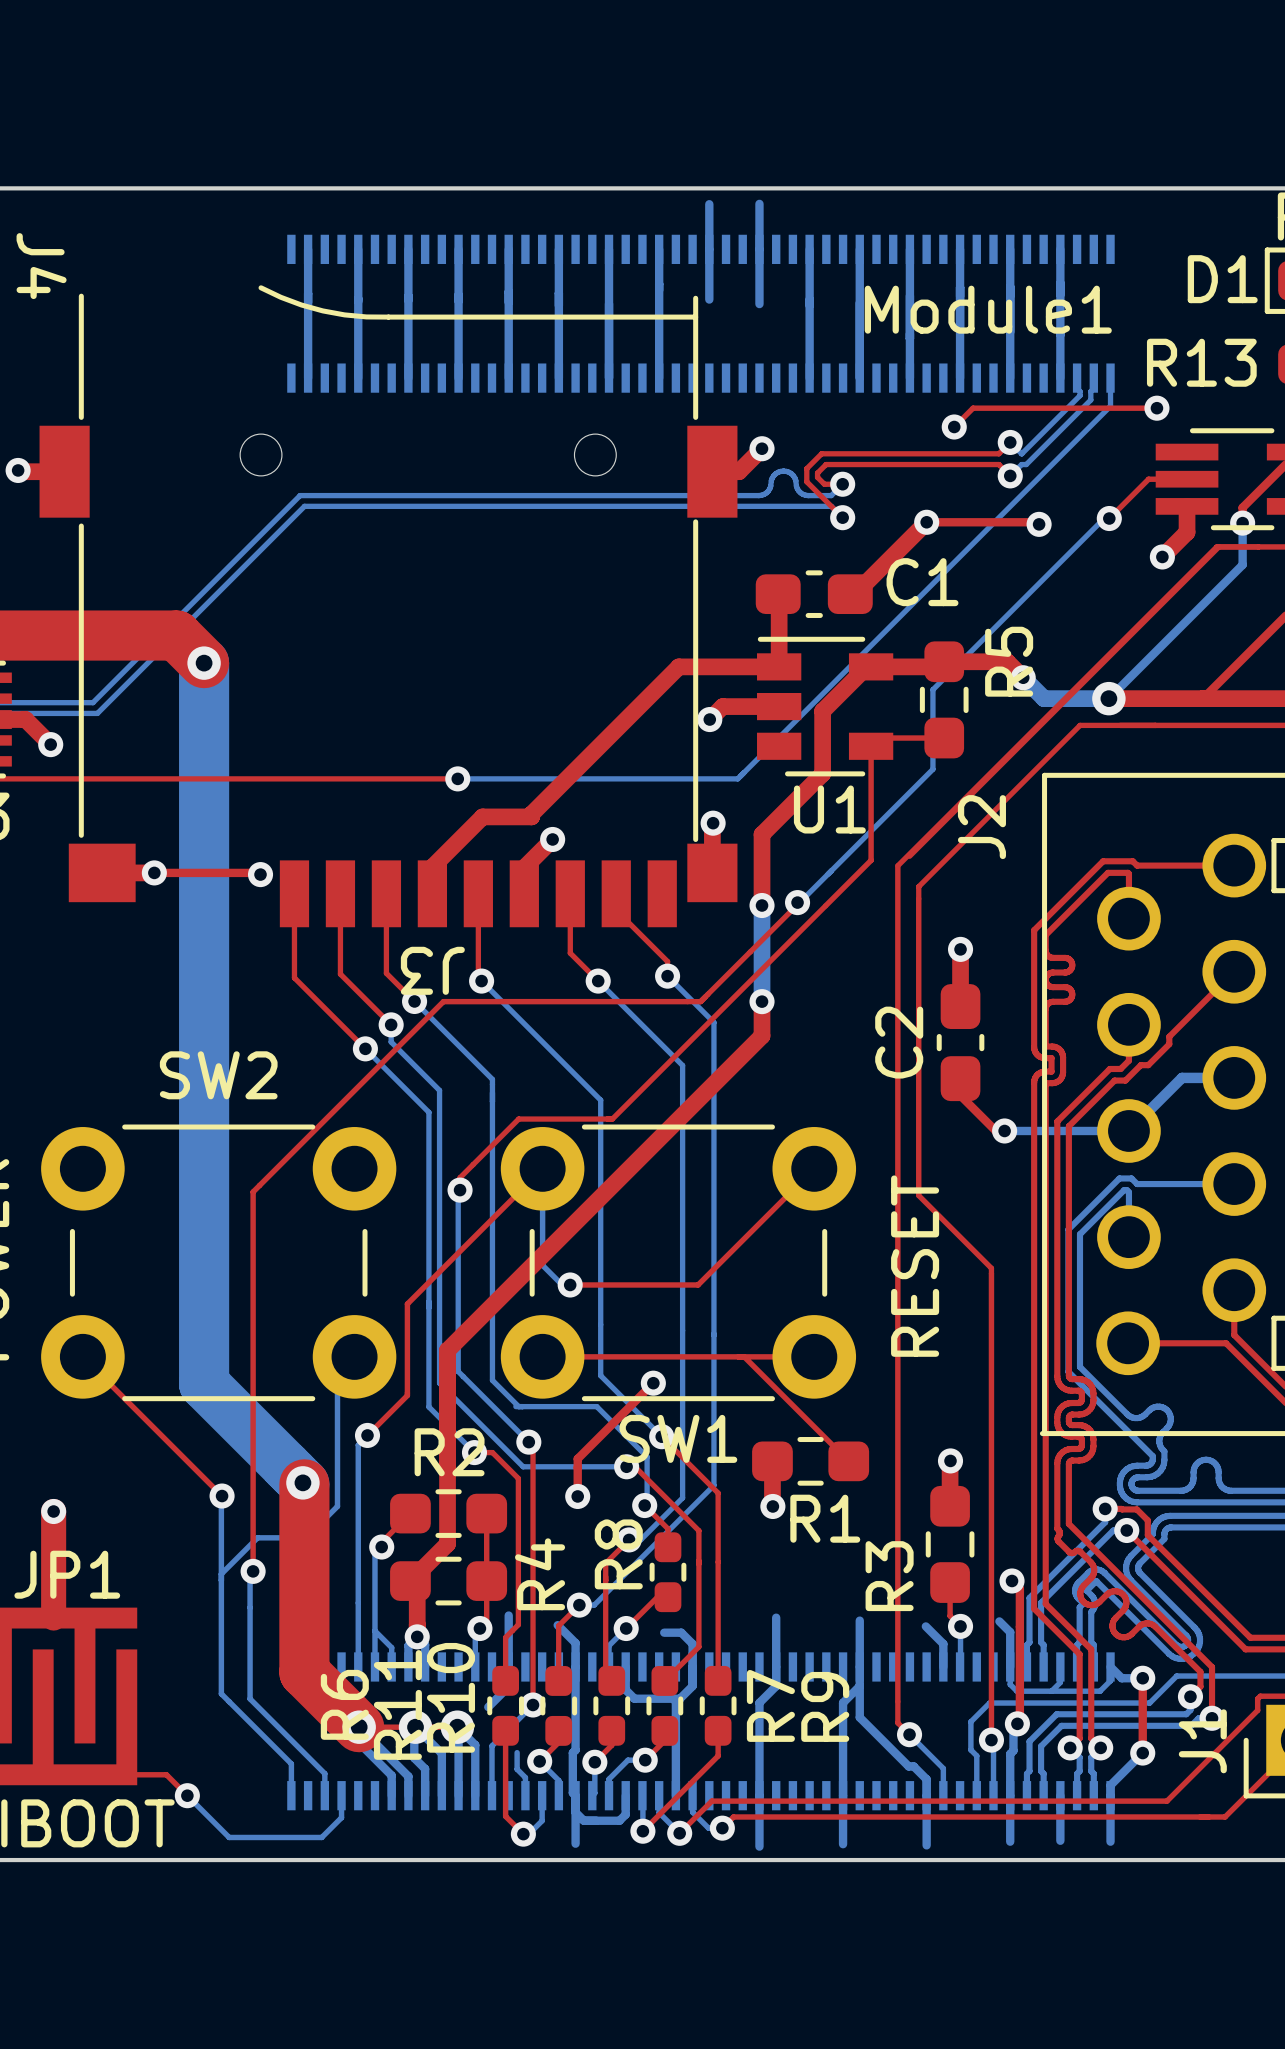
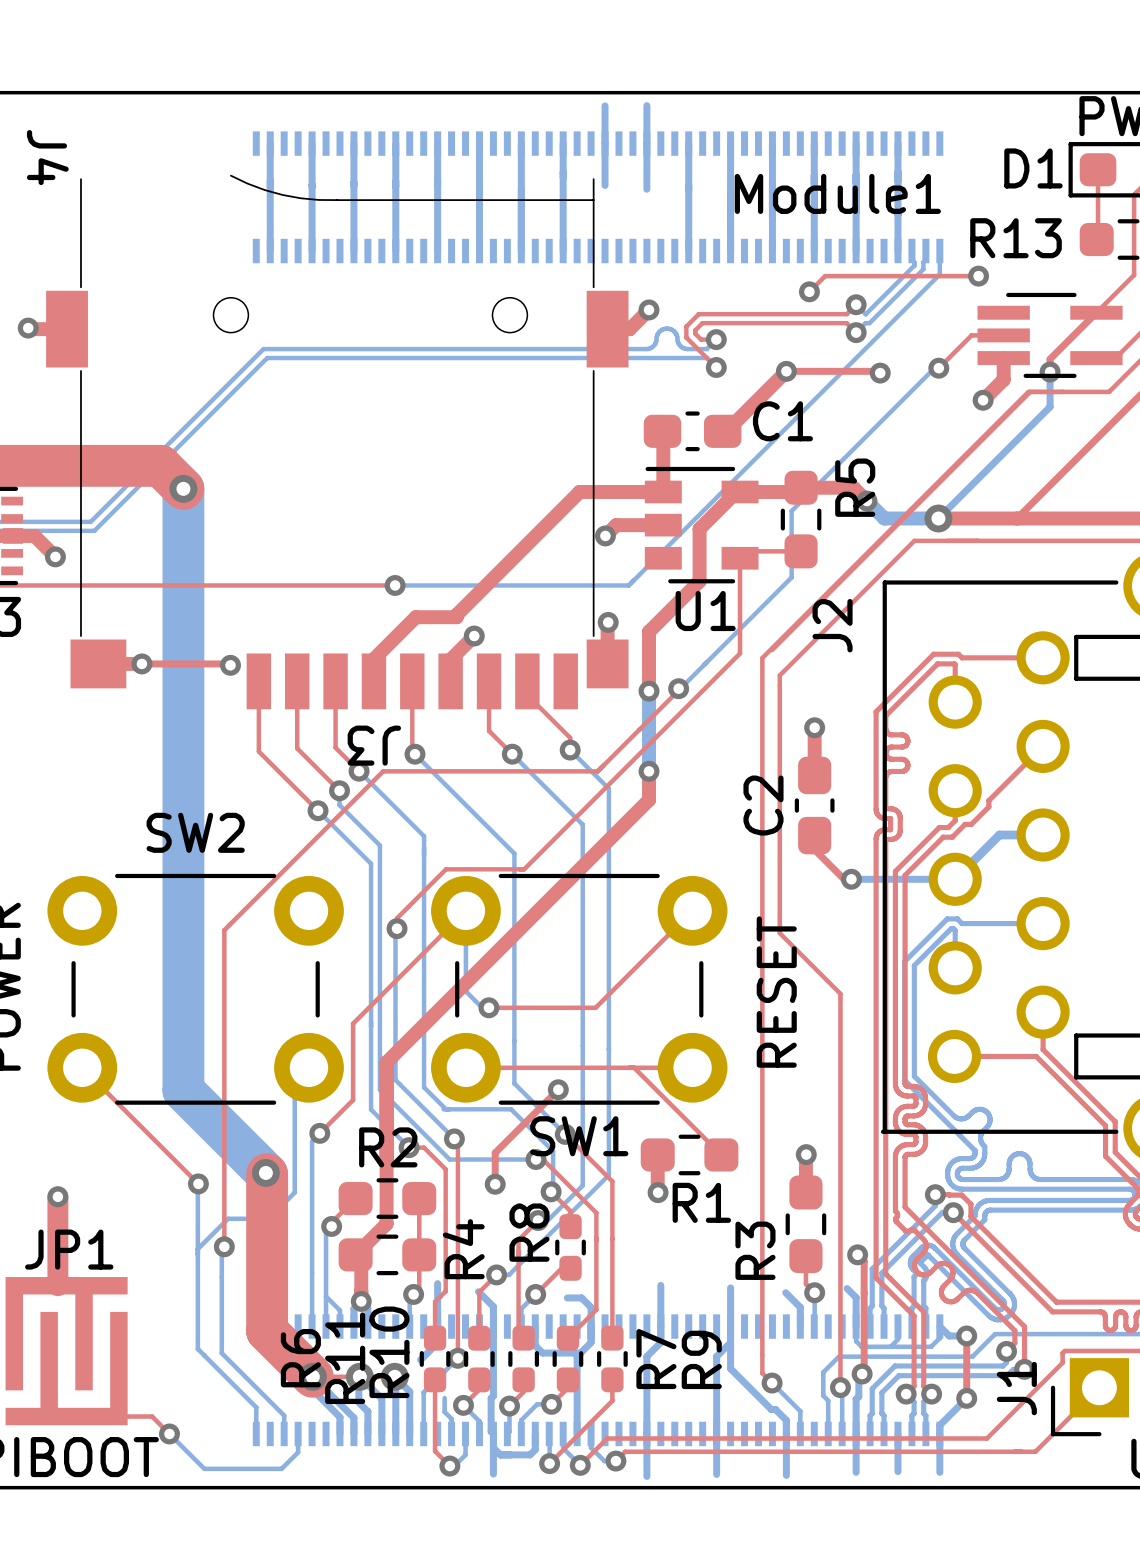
J3 footprint: [39, 285, 738, 928] -> [46, 174, 629, 710]

